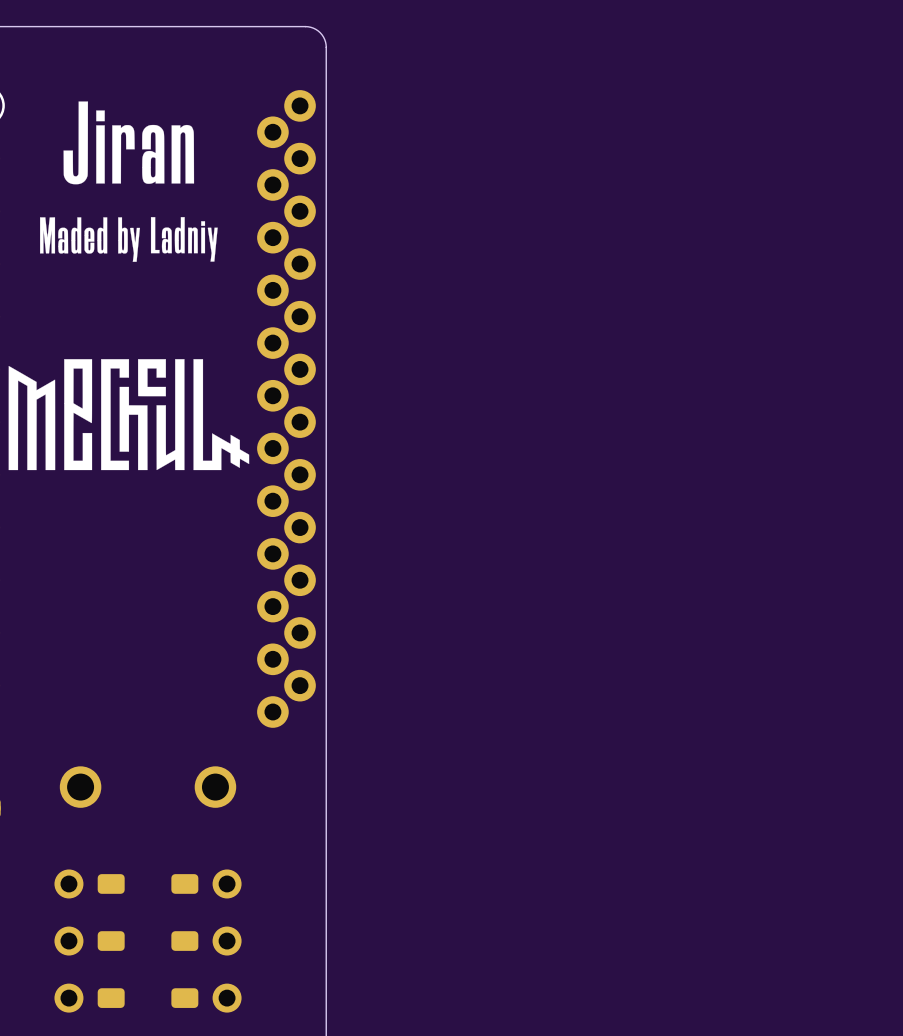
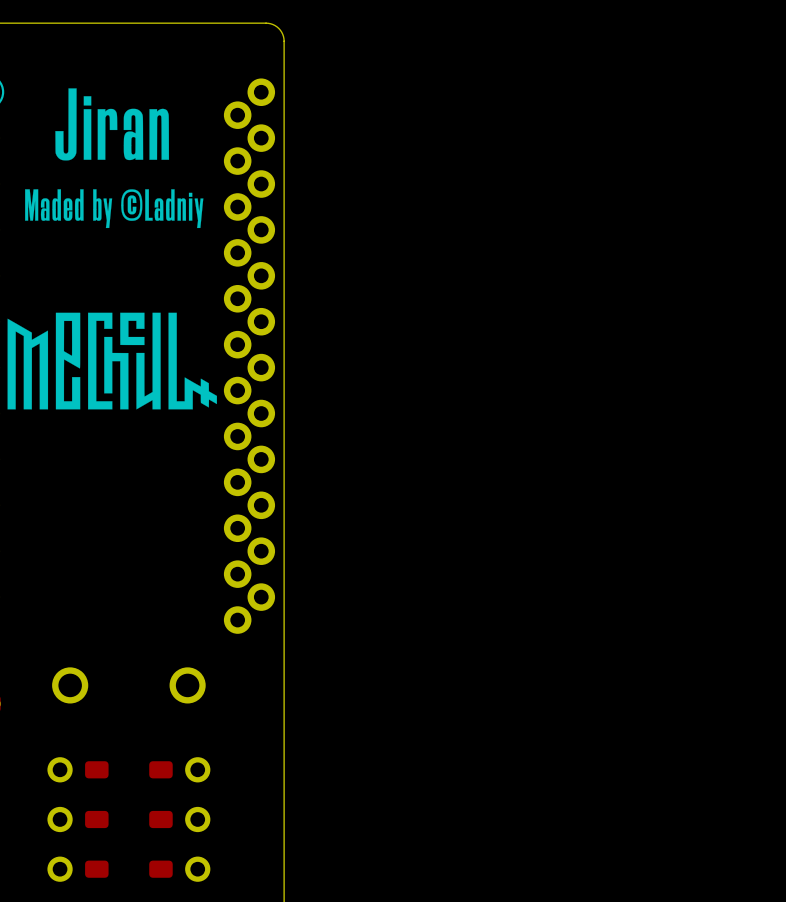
drawing shape: [8, 101, 250, 471] -> [7, 88, 217, 410]

